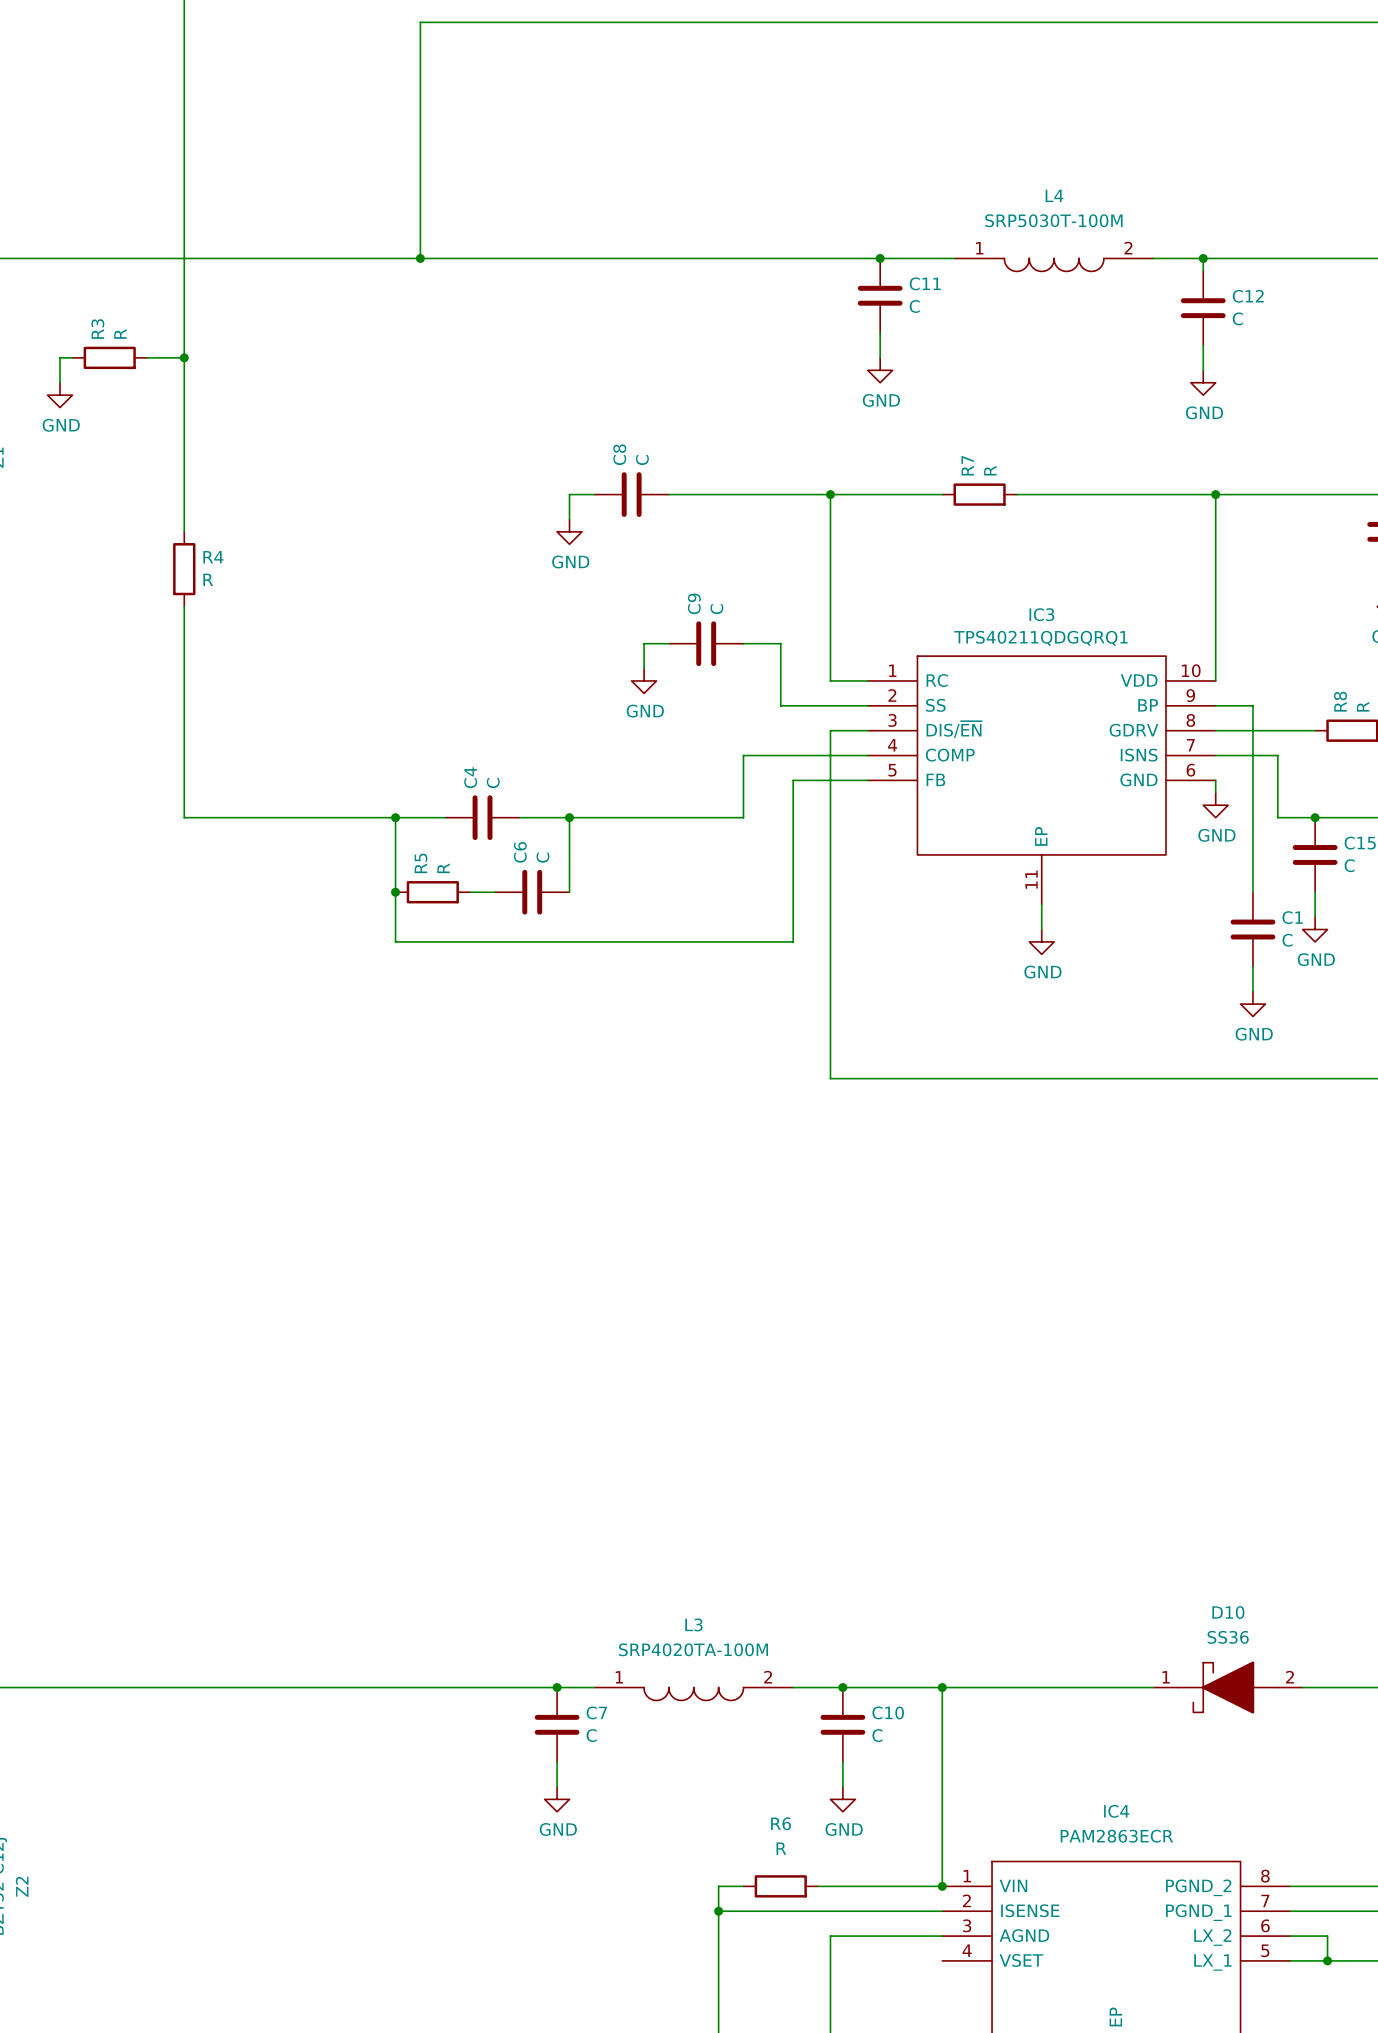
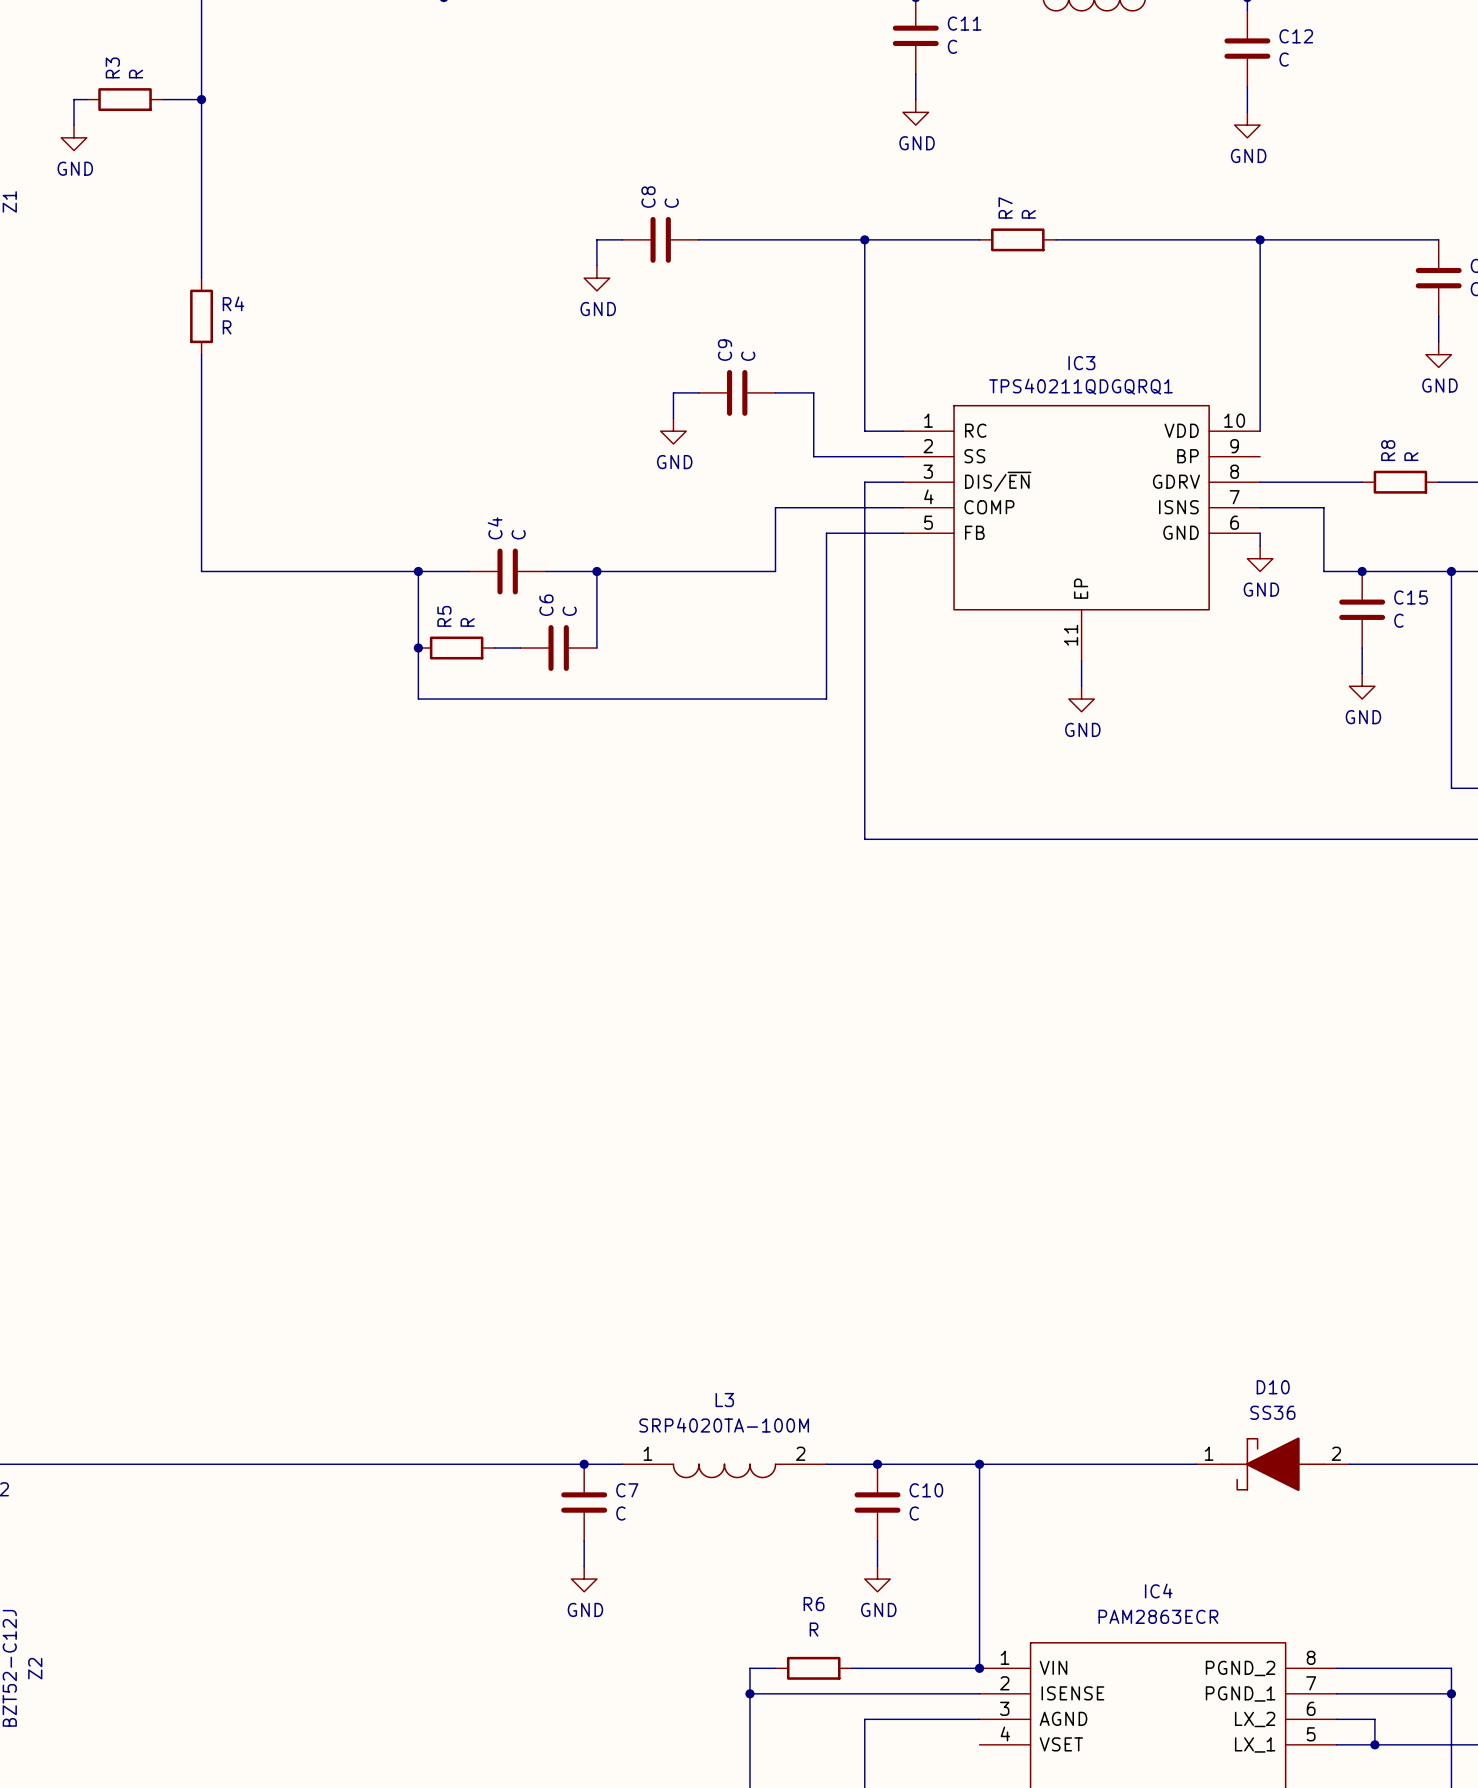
wire: (1215, 705) (1252, 705) (1252, 892) -> none
C1: C (1252, 929) -> none
wire: (1252, 966) (1252, 991) -> none
power symbol: GND (1252, 1004) -> none

